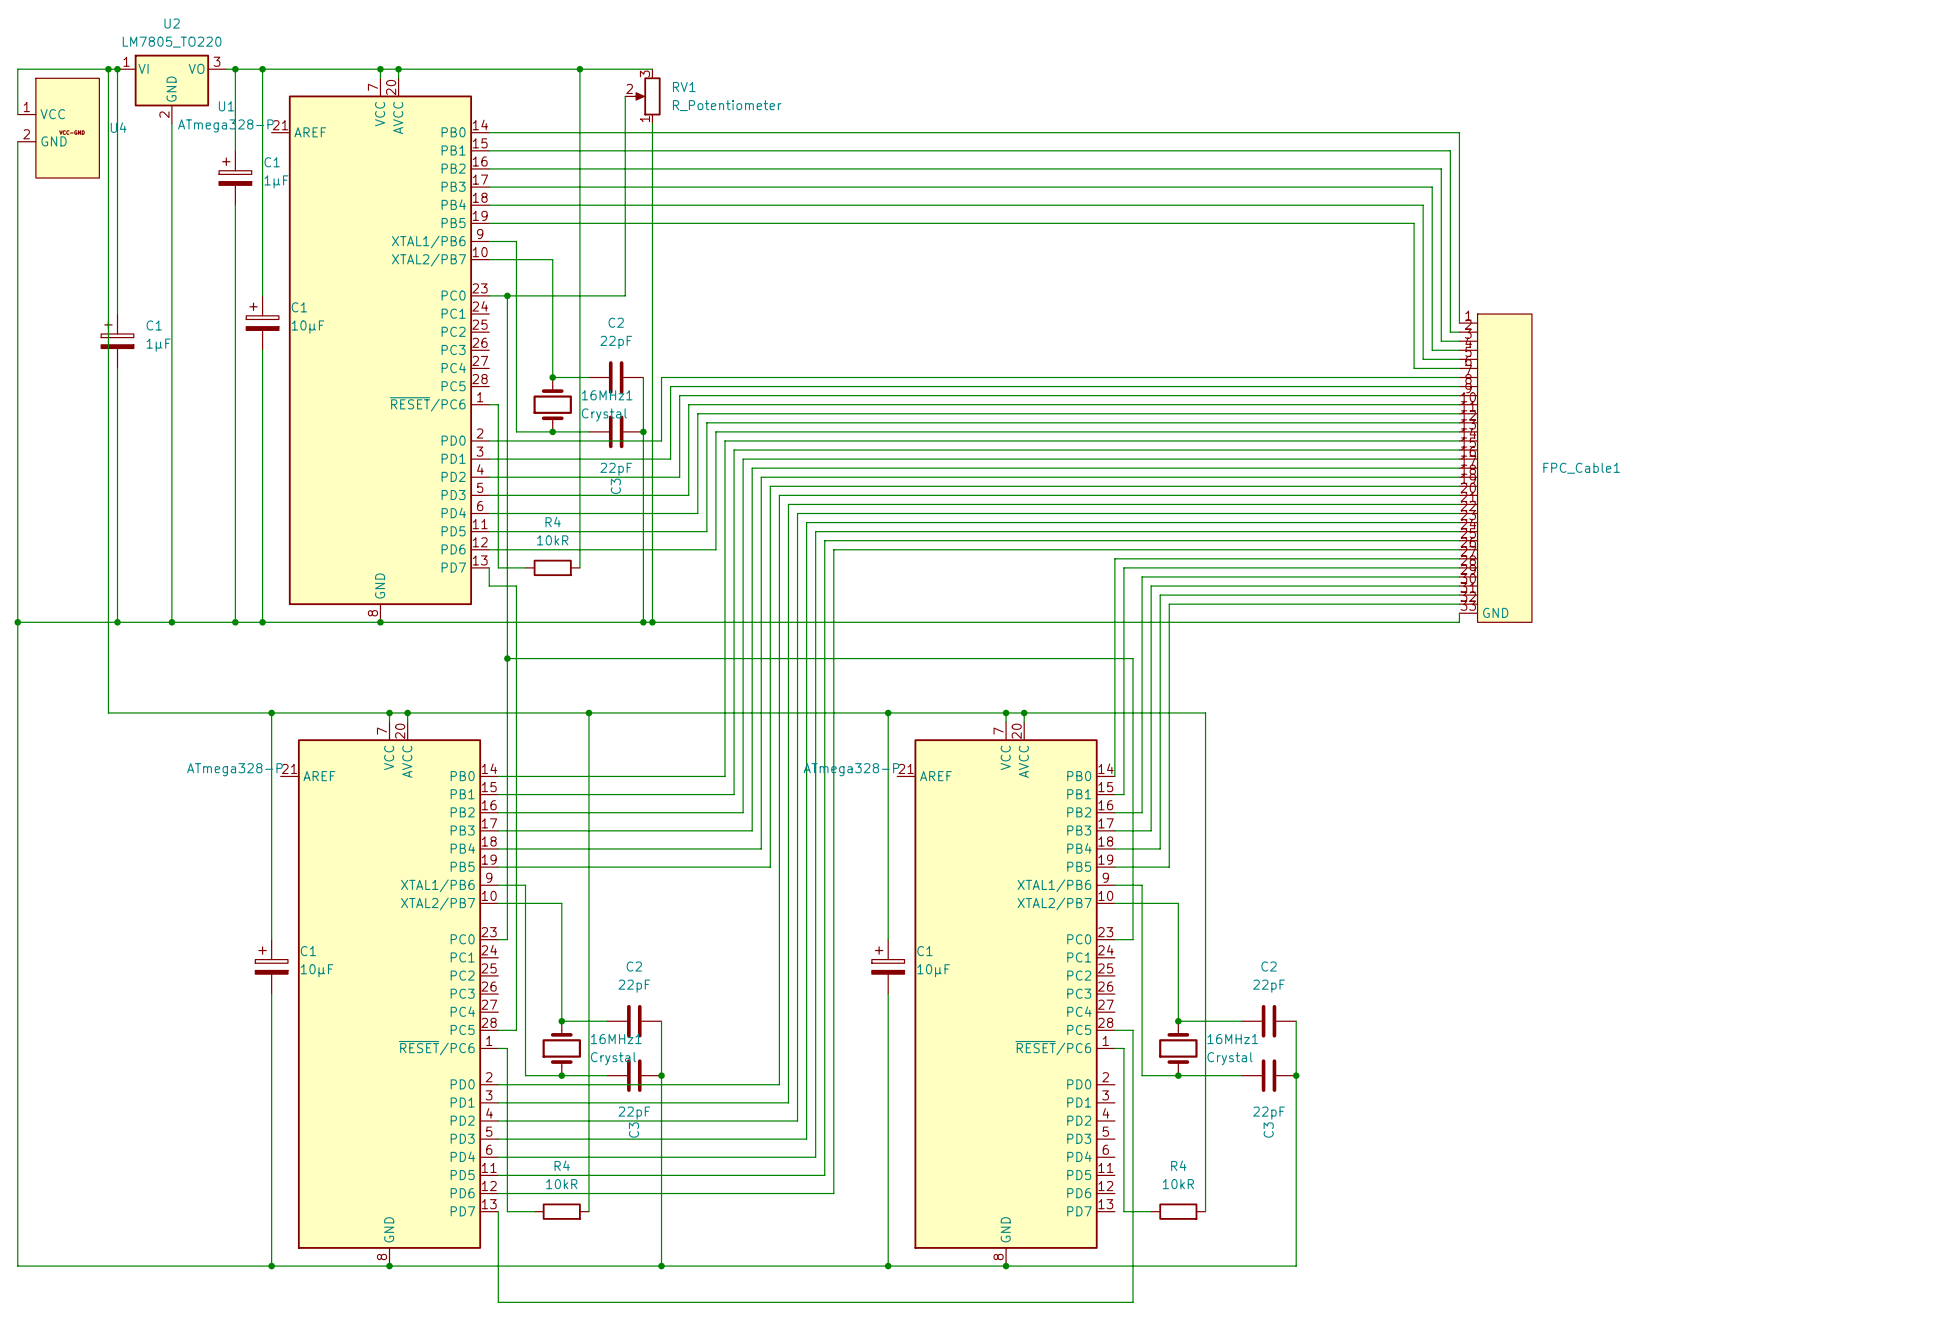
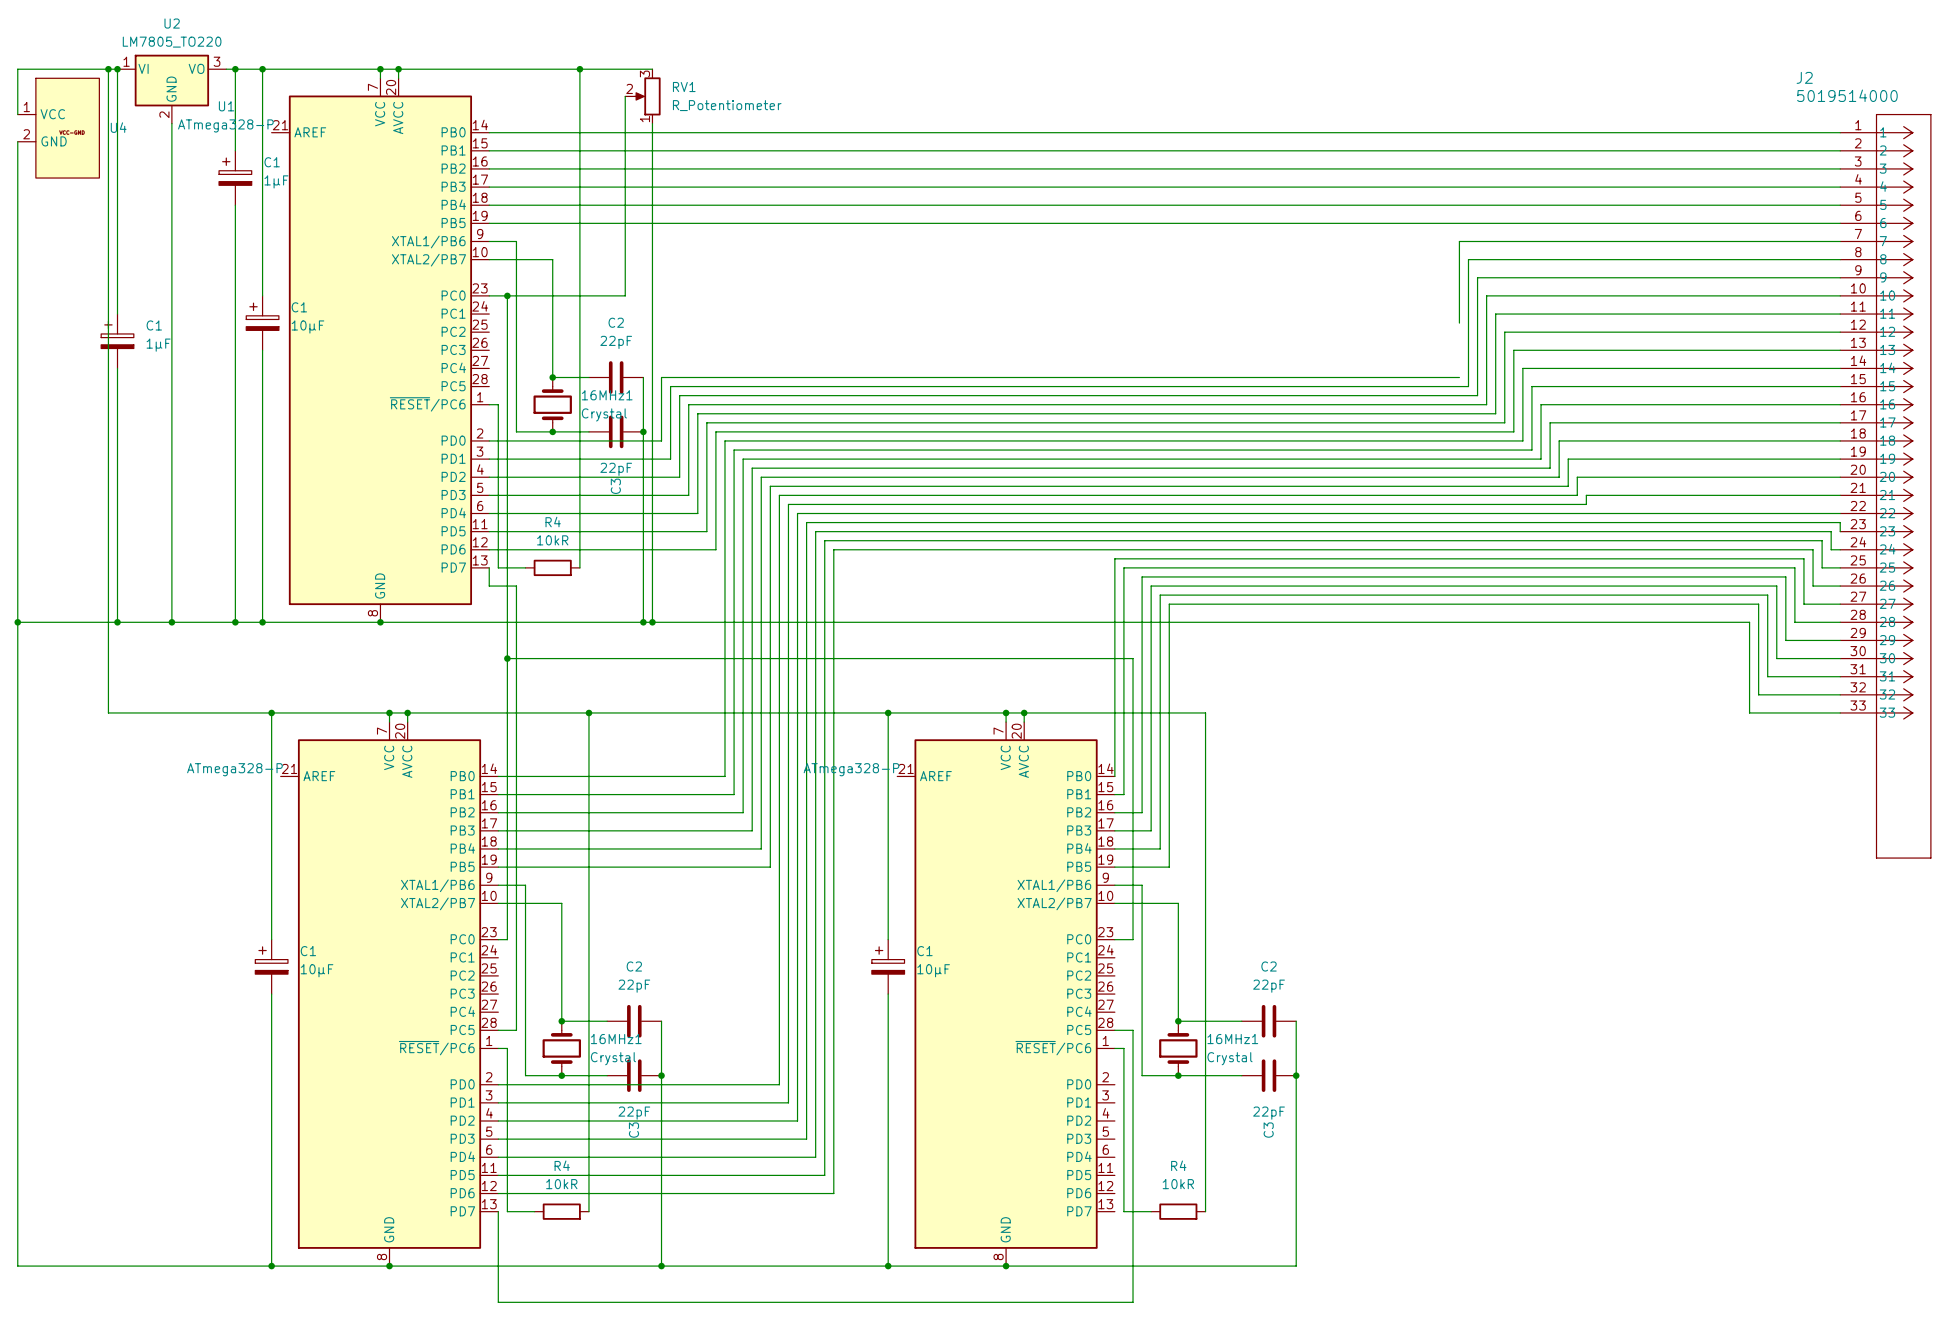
wire: (1459, 132) (1459, 241) -> (1459, 132) (1840, 132)
wire: (1450, 150) (1450, 332) (1459, 332) -> (1450, 150) (1840, 150)
wire: (1441, 168) (1441, 341) (1459, 341) -> (1441, 168) (1840, 168)
wire: (1432, 187) (1432, 350) (1459, 350) -> (1432, 187) (1840, 187)
wire: (1423, 205) (1423, 359) (1459, 359) -> (1423, 205) (1840, 205)
wire: (1414, 223) (1414, 368) (1459, 368) -> (1414, 223) (1840, 223)
wire: none -> (1459, 241) (1840, 241)
wire: none -> (1840, 259) (1468, 259) (1468, 386) (1459, 386)
wire: none -> (1840, 277) (1477, 277) (1477, 395) (1459, 395)
wire: none -> (1840, 295) (1486, 295) (1486, 404) (1459, 404)
wire: none -> (1840, 314) (1495, 314) (1495, 413) (1459, 413)
wire: none -> (1840, 332) (1504, 332) (1504, 422) (1459, 422)
wire: none -> (1840, 350) (1513, 350) (1513, 431) (1459, 431)
wire: none -> (1840, 368) (1522, 368) (1522, 440) (1459, 440)
wire: none -> (1840, 386) (1531, 386) (1531, 450) (1459, 450)
wire: none -> (1840, 404) (1541, 404) (1541, 459) (1459, 459)
wire: none -> (1840, 422) (1550, 422) (1550, 468) (1459, 468)
wire: none -> (1840, 440) (1559, 440) (1559, 477) (1459, 477)
wire: none -> (1840, 459) (1568, 459) (1568, 486) (1459, 486)
FPC_Cable1: (1495, 468) -> none
wire: none -> (1840, 477) (1577, 477) (1577, 495) (1459, 495)
J2: none -> 5019514000 (1885, 486)
wire: none -> (1840, 495) (1586, 495) (1586, 504) (1459, 504)
wire: none -> (1459, 513) (1840, 513)
wire: none -> (1459, 522) (1840, 522) (1840, 531)
wire: none -> (1459, 531) (1831, 531) (1831, 549) (1840, 549)
wire: none -> (1459, 540) (1822, 540) (1822, 567) (1840, 567)
wire: none -> (1459, 549) (1813, 549) (1813, 586) (1840, 586)
wire: none -> (1459, 558) (1803, 558) (1803, 604) (1840, 604)
wire: none -> (1459, 567) (1794, 567) (1794, 622) (1840, 622)
wire: none -> (1459, 576) (1785, 576) (1785, 640) (1840, 640)
wire: none -> (1459, 586) (1776, 586) (1776, 658) (1840, 658)
wire: none -> (1459, 595) (1767, 595) (1767, 676) (1840, 676)
wire: none -> (1459, 604) (1758, 604) (1758, 694) (1840, 694)
wire: (1459, 613) (1459, 622) -> (1840, 712) (1749, 712) (1749, 622) (1459, 622)

